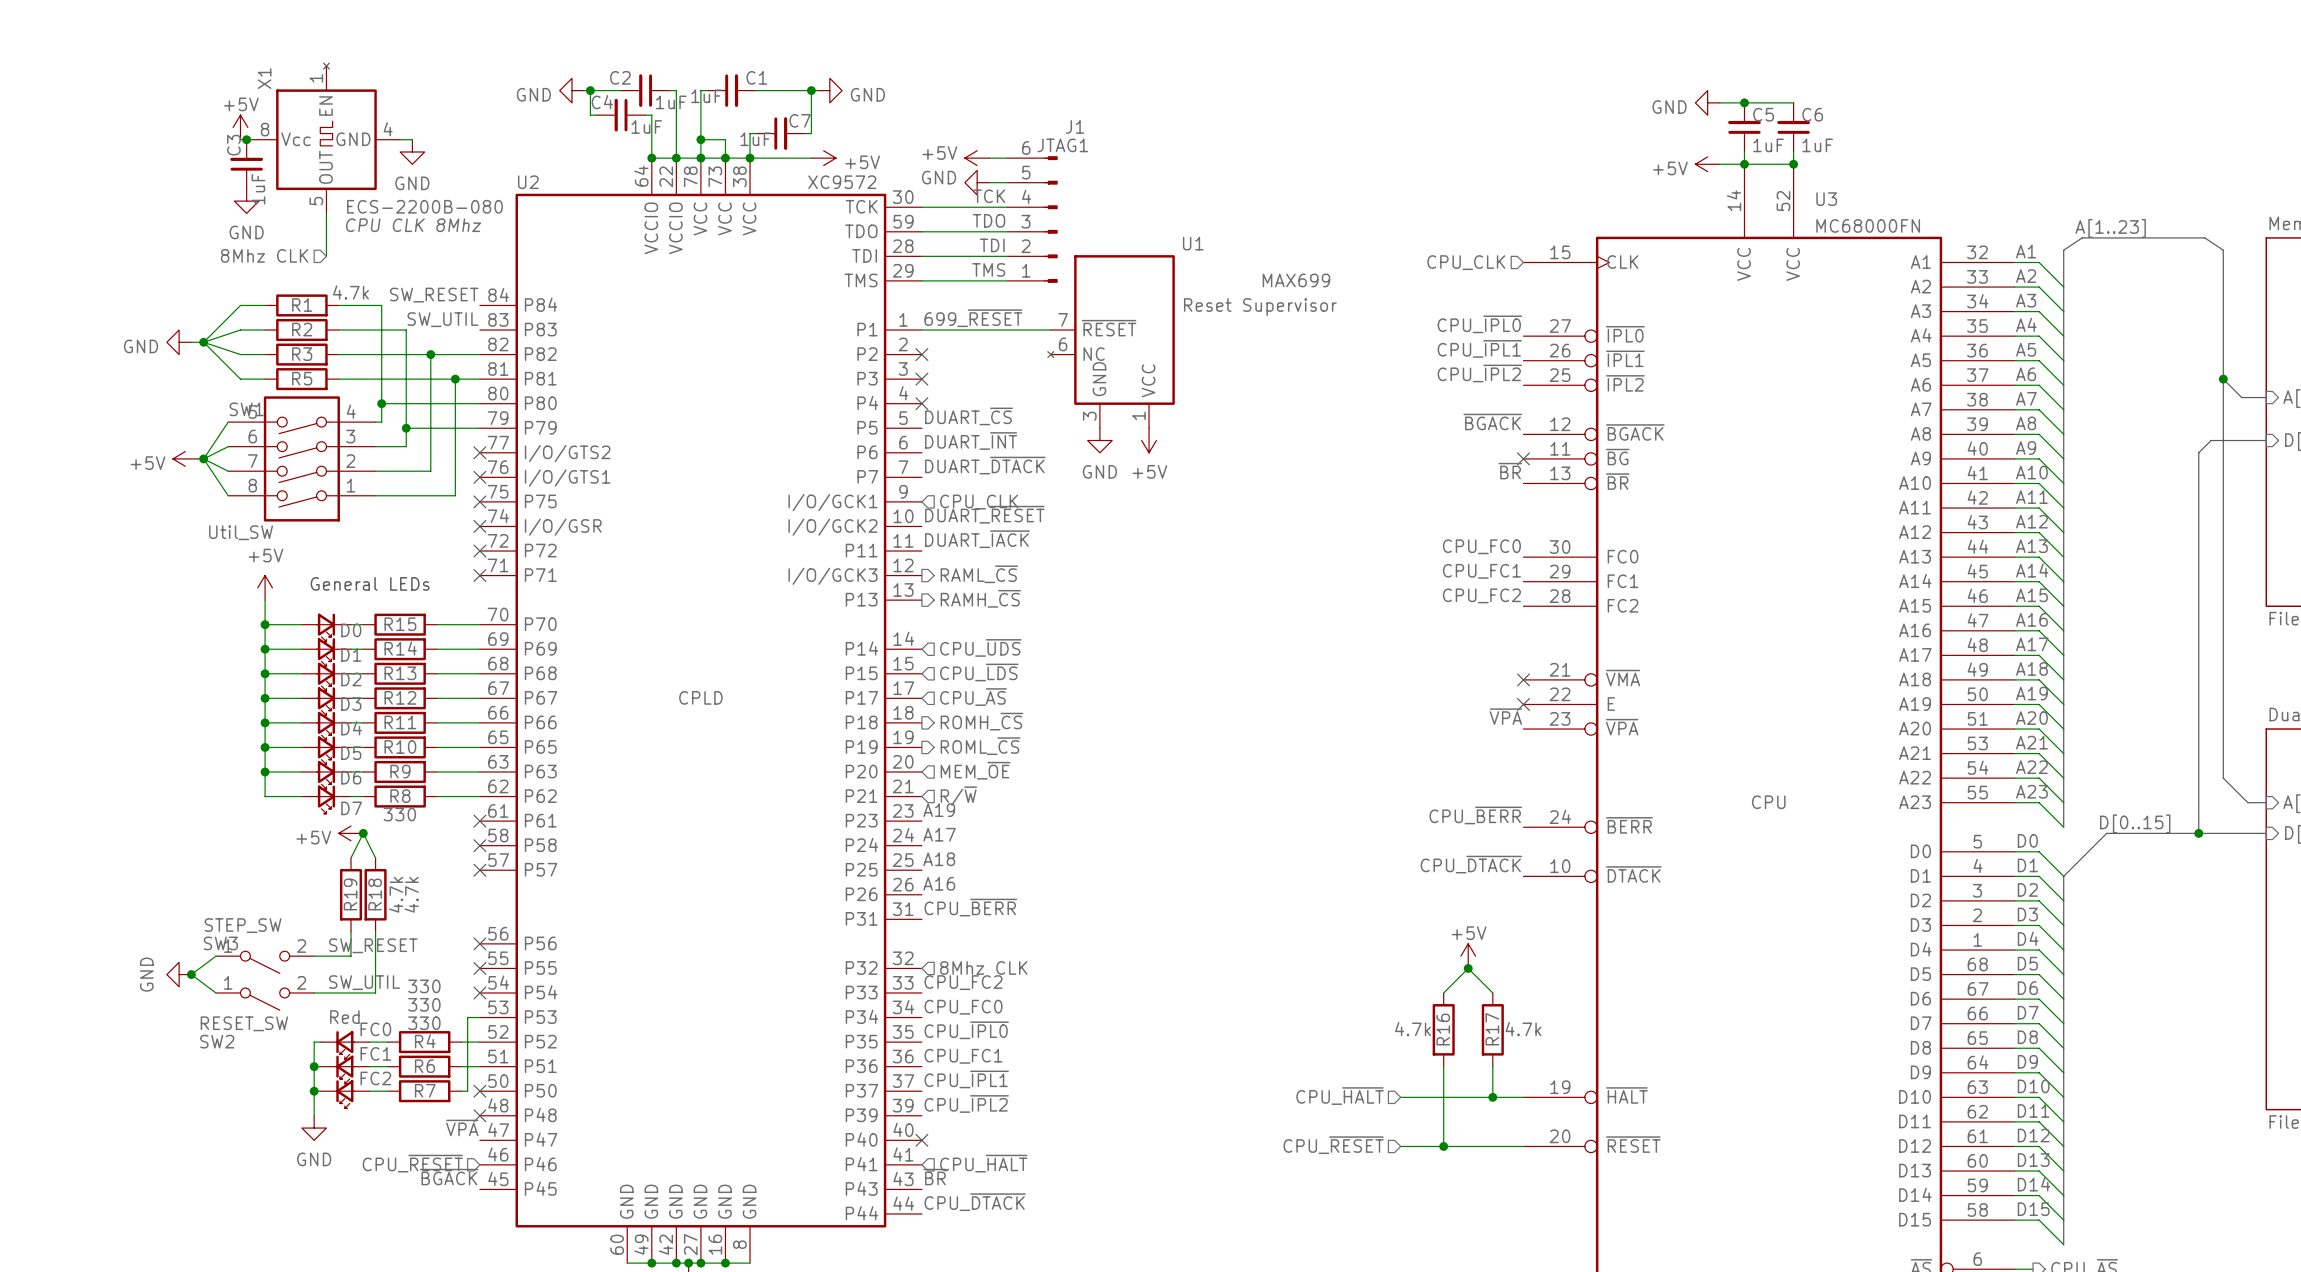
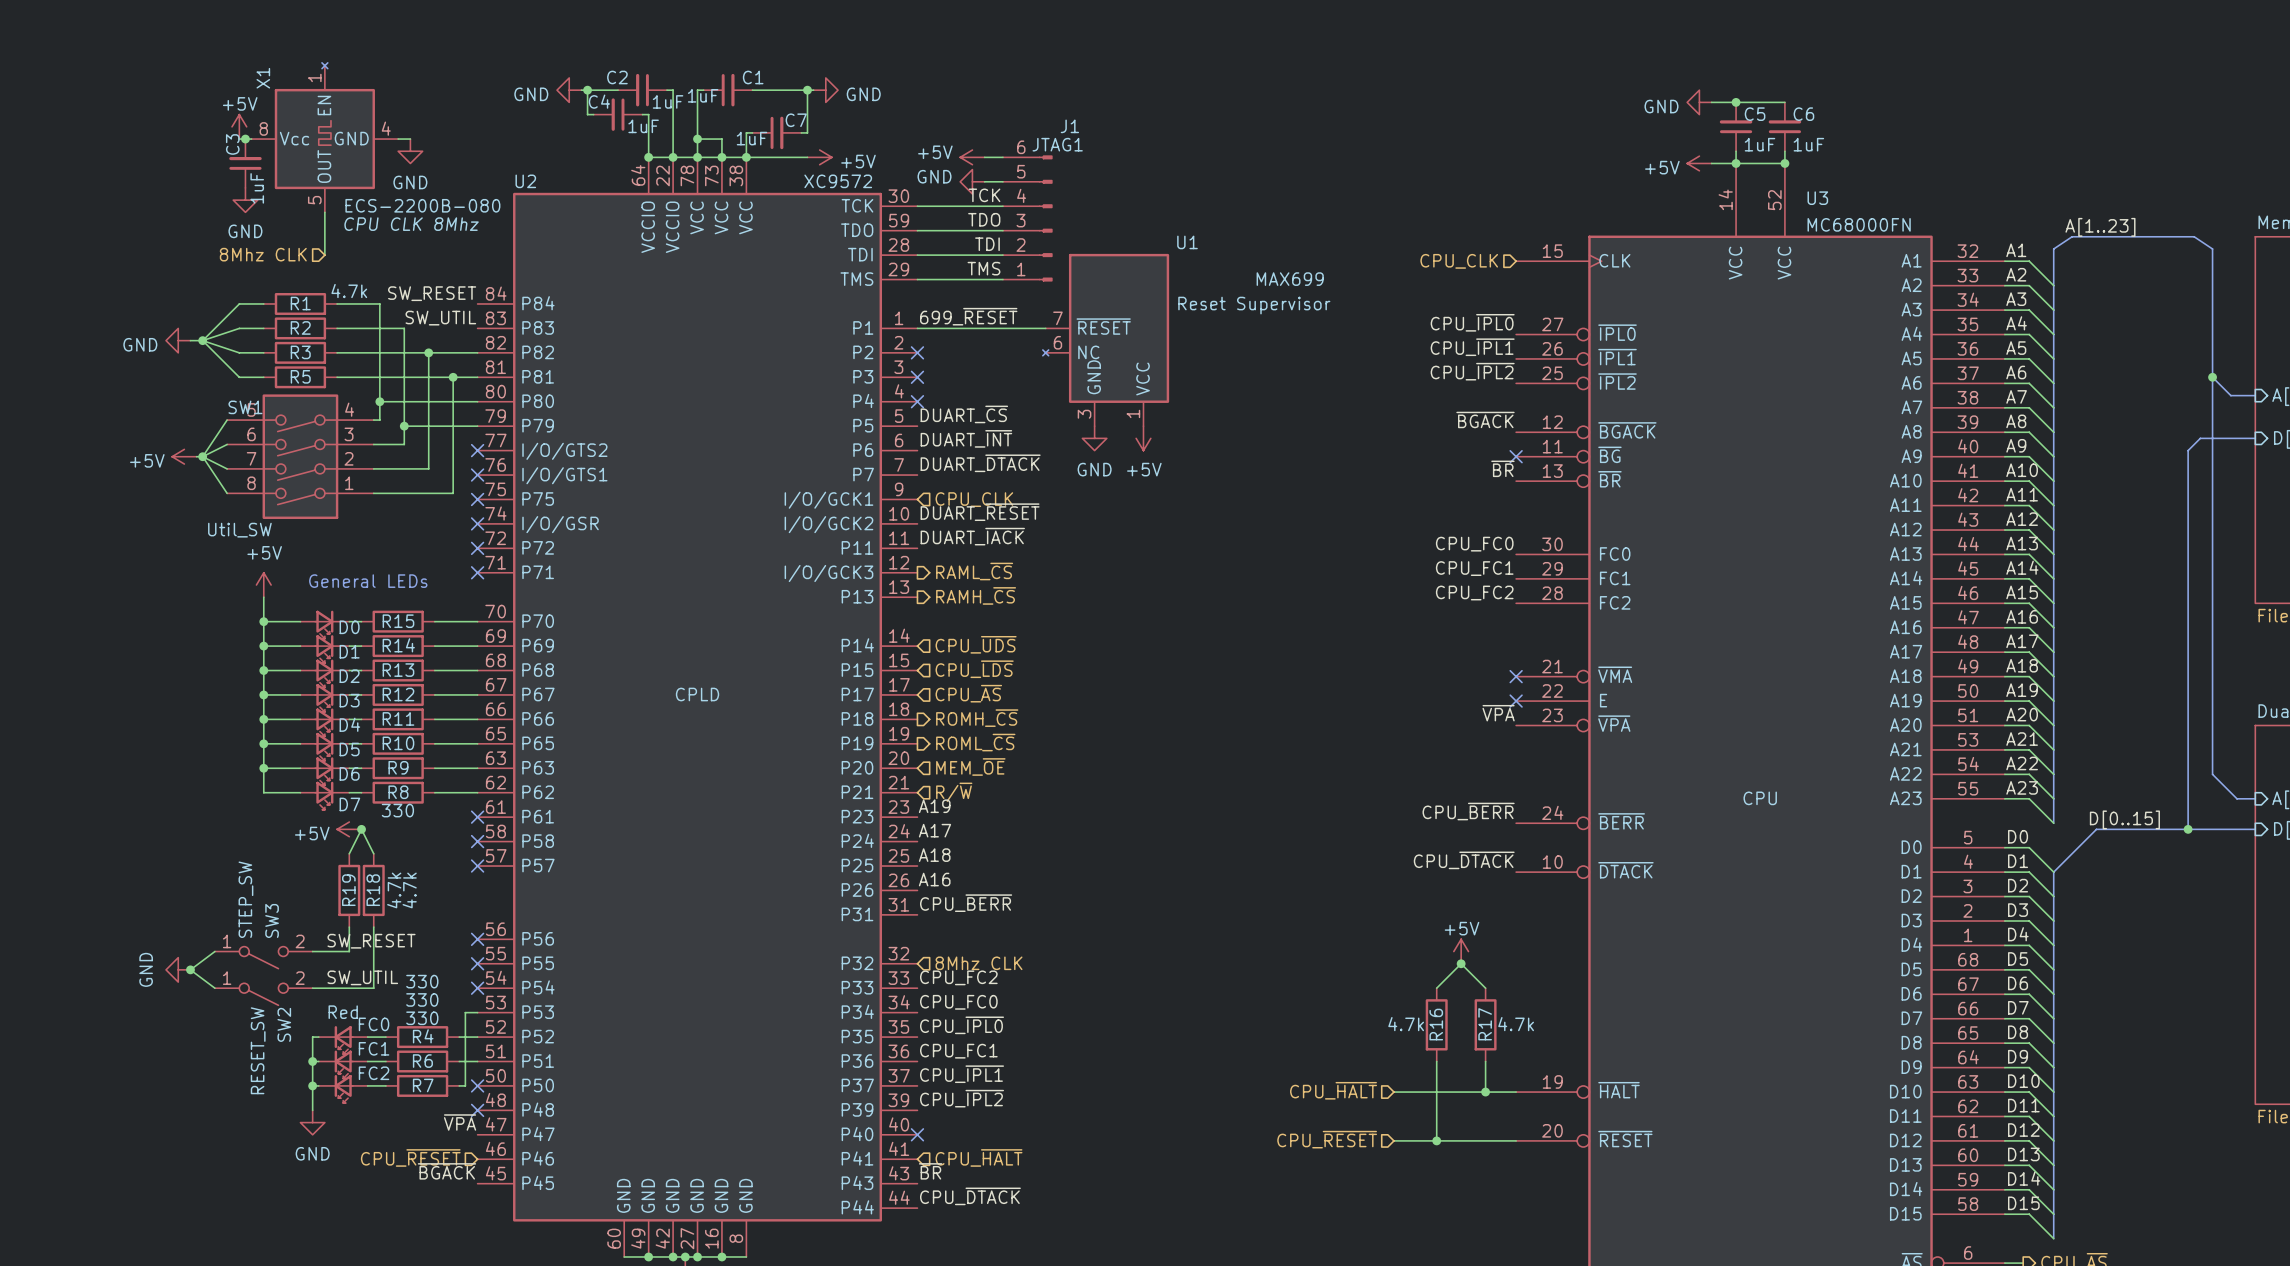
SW3 value rotation: 0° (243, 925) -> 90° counterclockwise (245, 899)
SW3 name rotation: 0° (220, 943) -> 90° counterclockwise (272, 920)
SW3 name position: SW3 (220, 943) -> SW3 (272, 920)
SW2 value rotation: 0° (244, 1023) -> 90° counterclockwise (258, 1050)
SW2 name rotation: 0° (217, 1041) -> 90° counterclockwise (284, 1024)
SW2 name position: SW2 (217, 1041) -> SW2 (284, 1024)

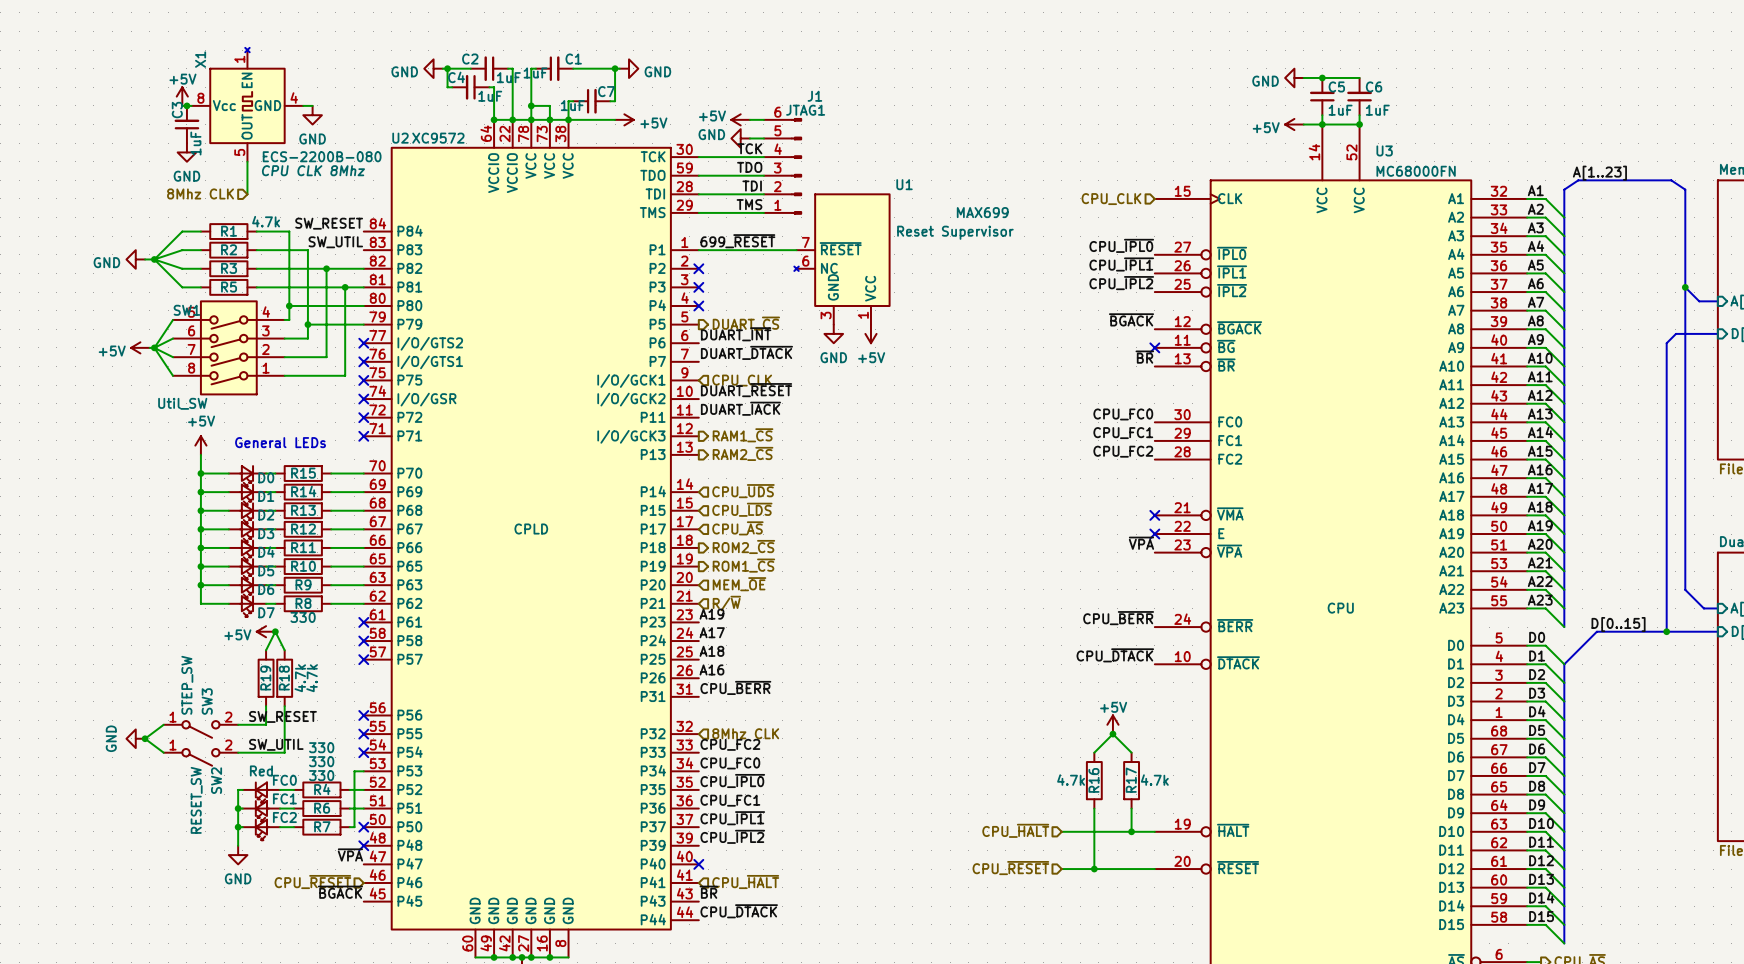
U2 value position: XC9572 (838, 181) -> XC9572 (438, 138)
label: DUART_~{CS} (964, 414) -> none
hierarchical label: none -> DUART_~{CS} (746, 323)
hierarchical label: RAML_~{CS} (974, 571) -> RAM1_~{CS} (743, 435)
hierarchical label: RAMH_~{CS} (976, 595) -> RAM2_~{CS} (743, 453)
hierarchical label: ROMH_~{CS} (977, 718) -> ROM2_~{CS} (743, 546)
hierarchical label: ROML_~{CS} (975, 742) -> ROM1_~{CS} (743, 565)

